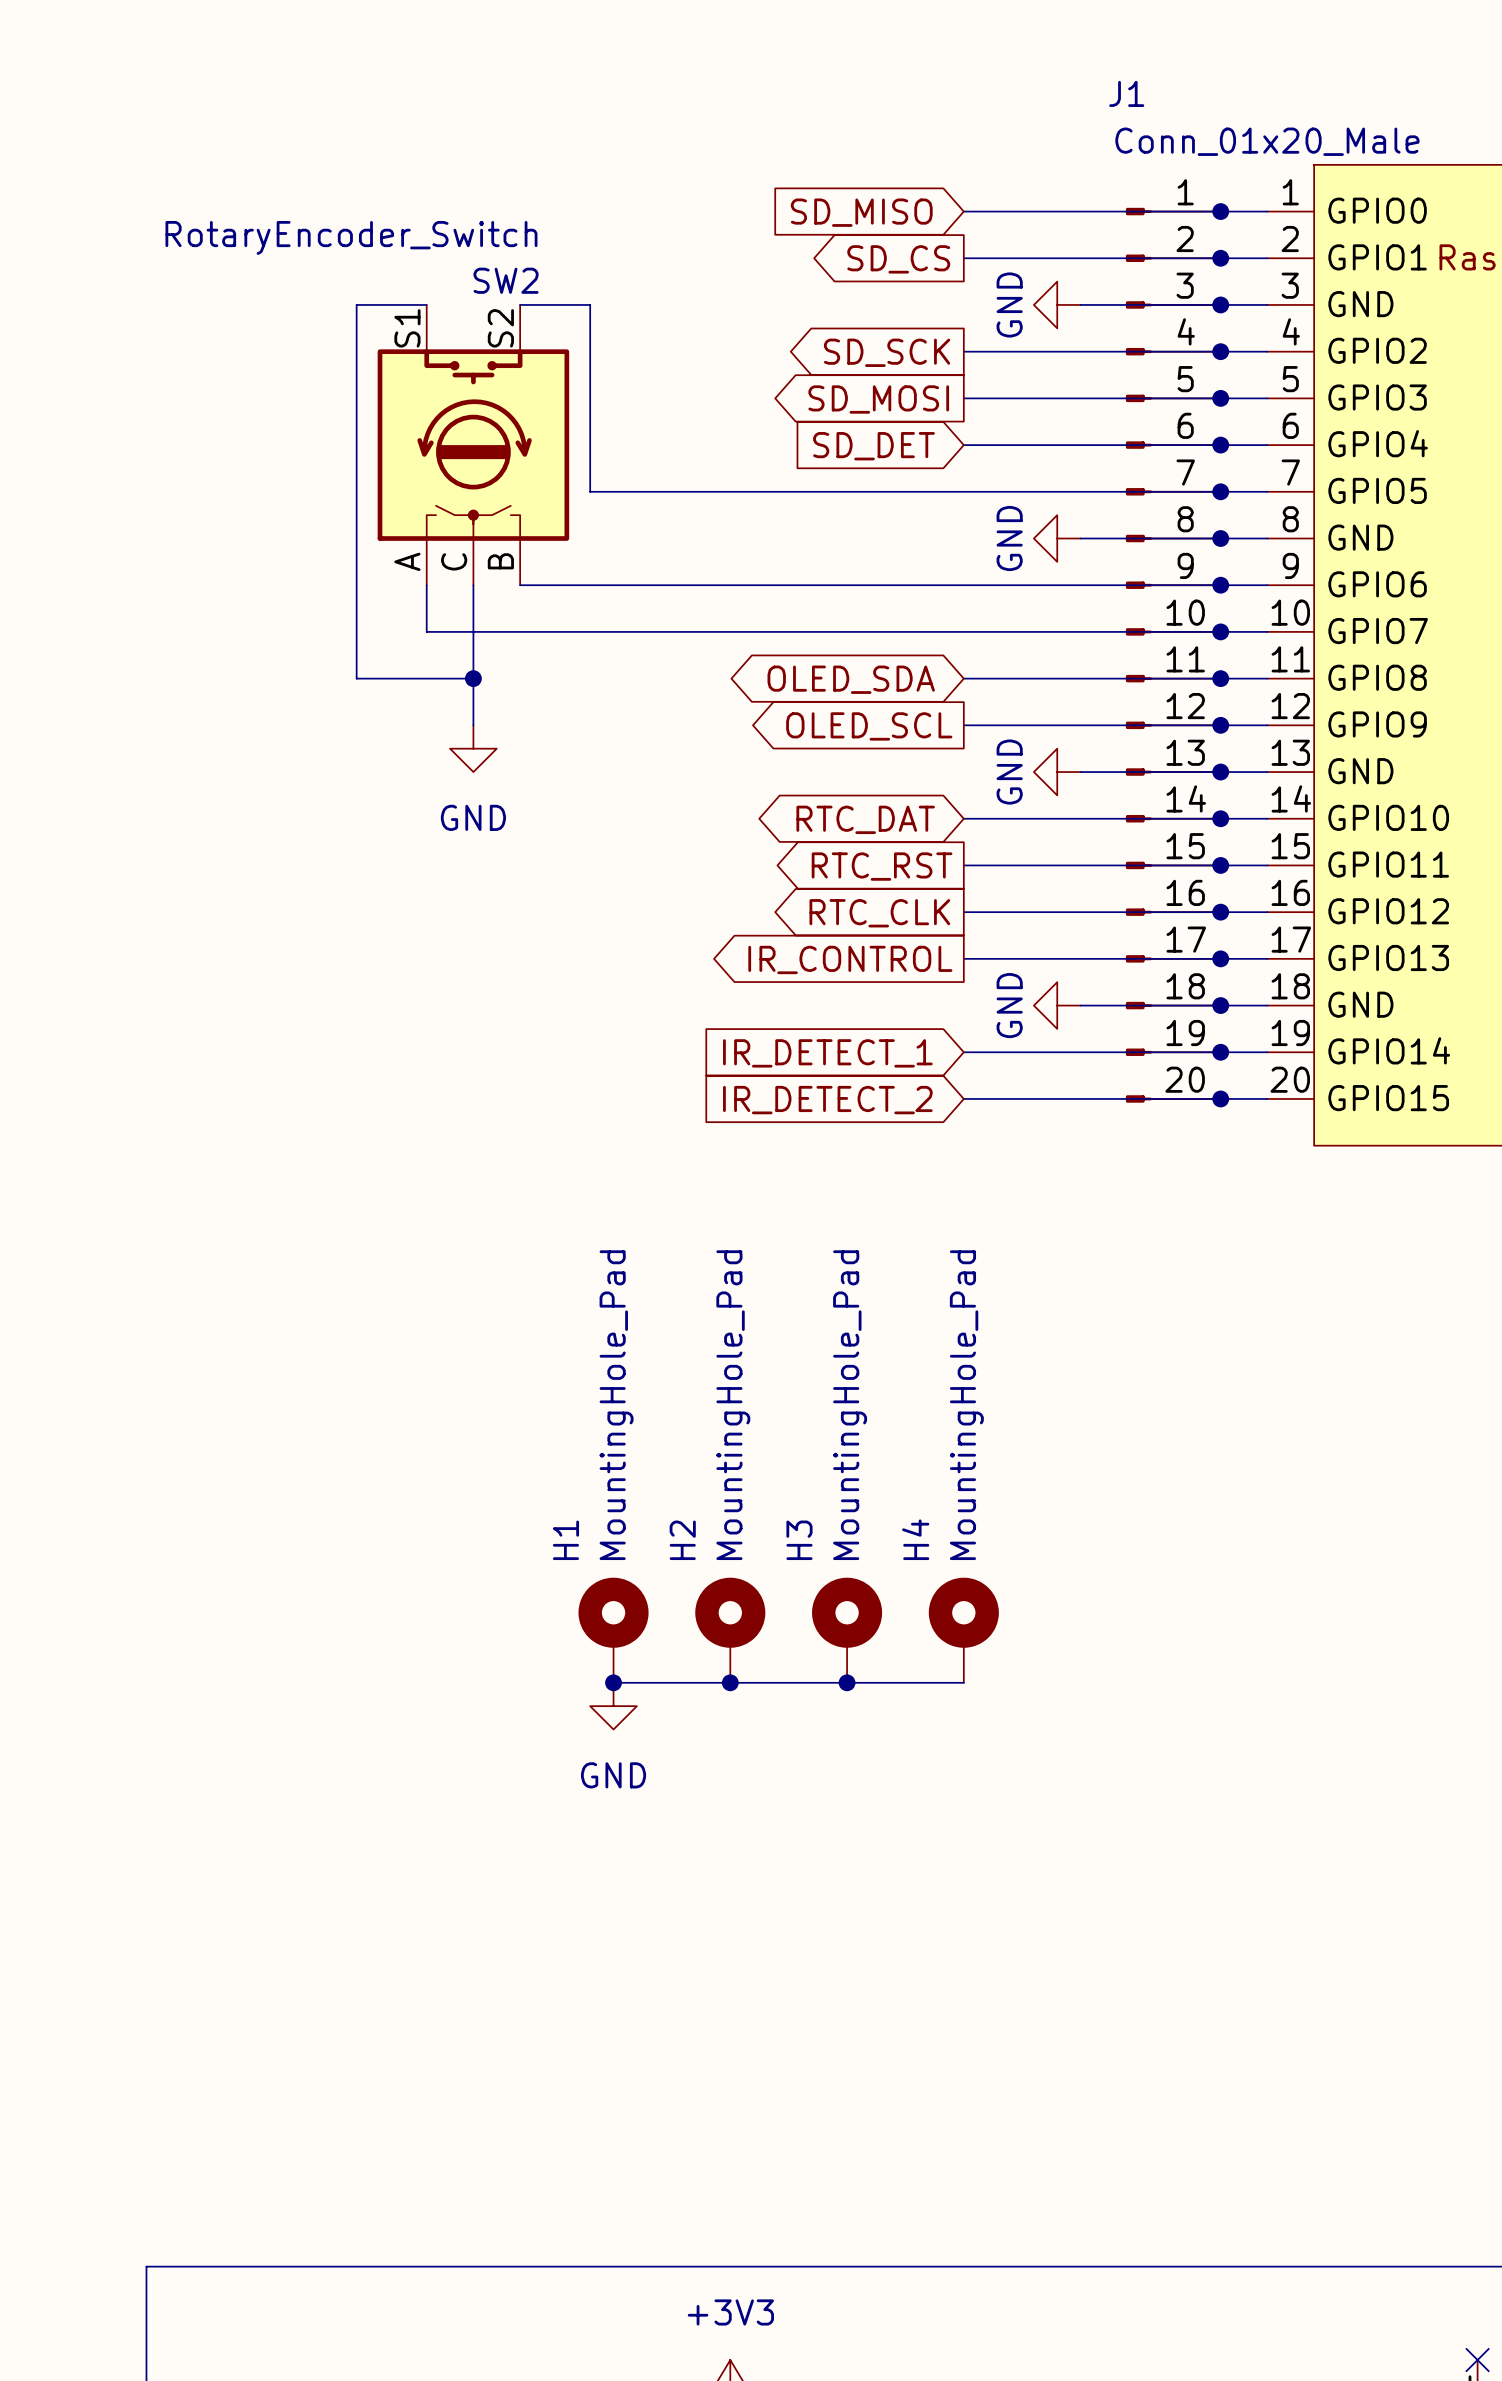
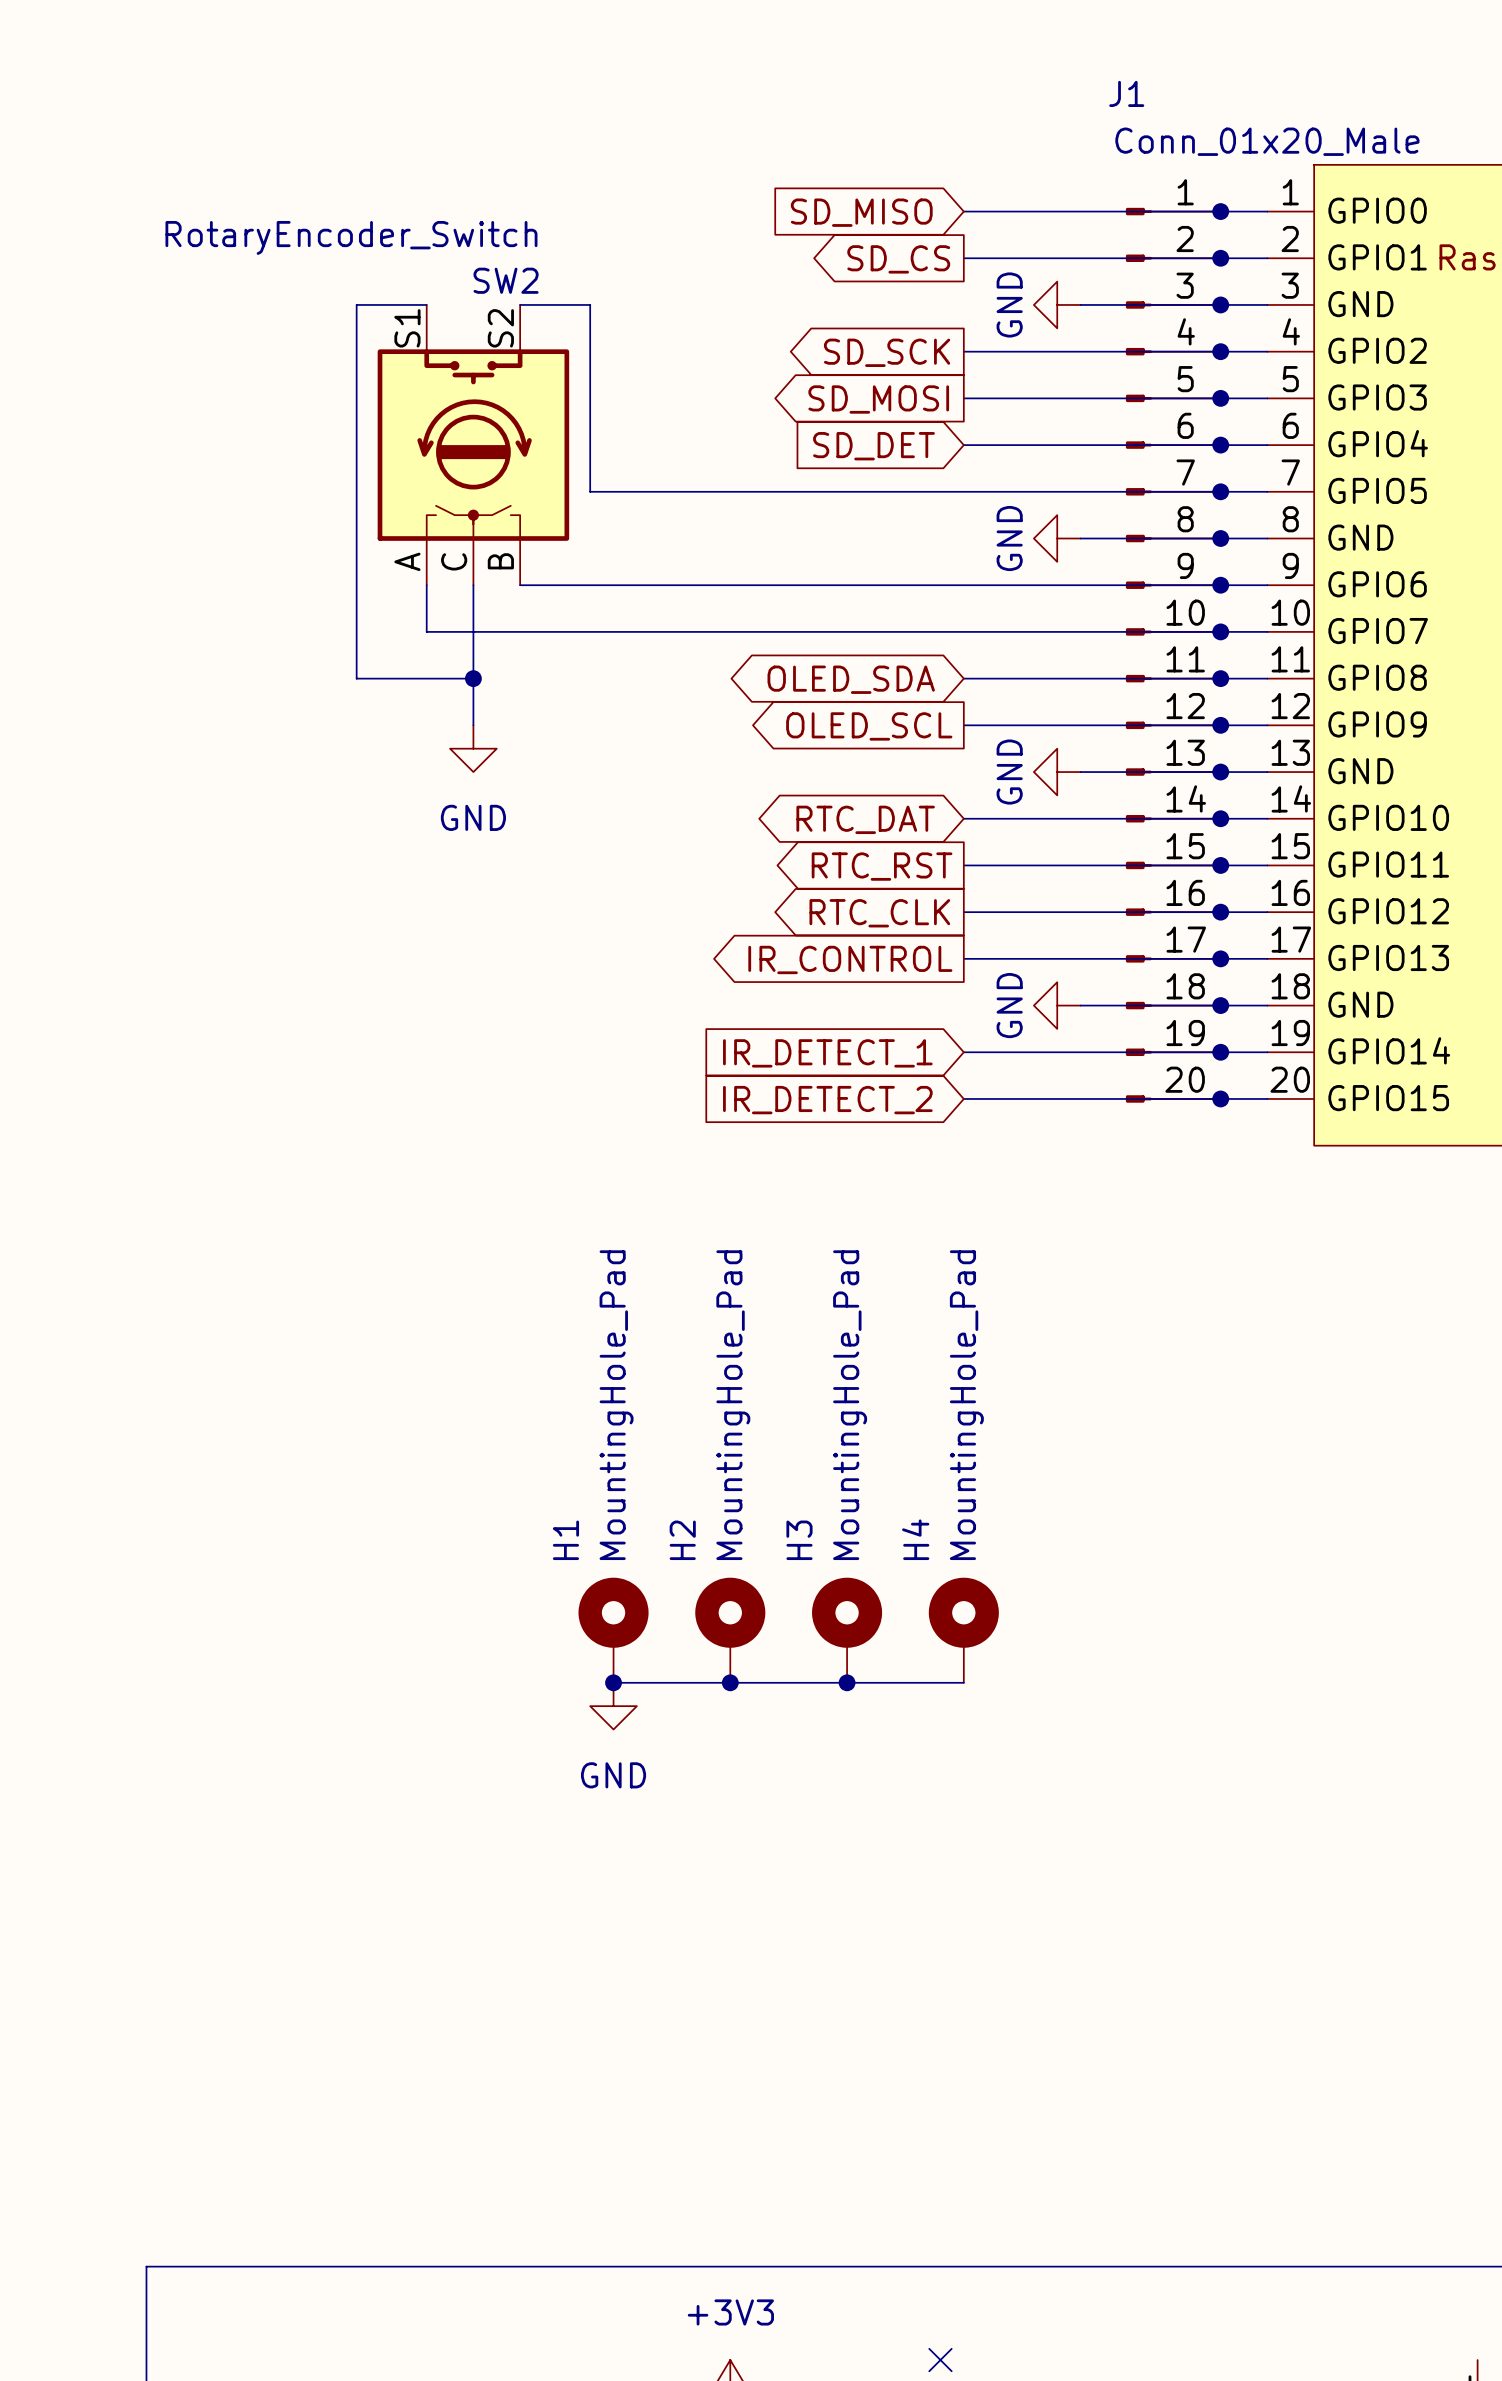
no-connect mark: none -> (940, 2360)
no-connect mark: (1477, 2360) -> none

